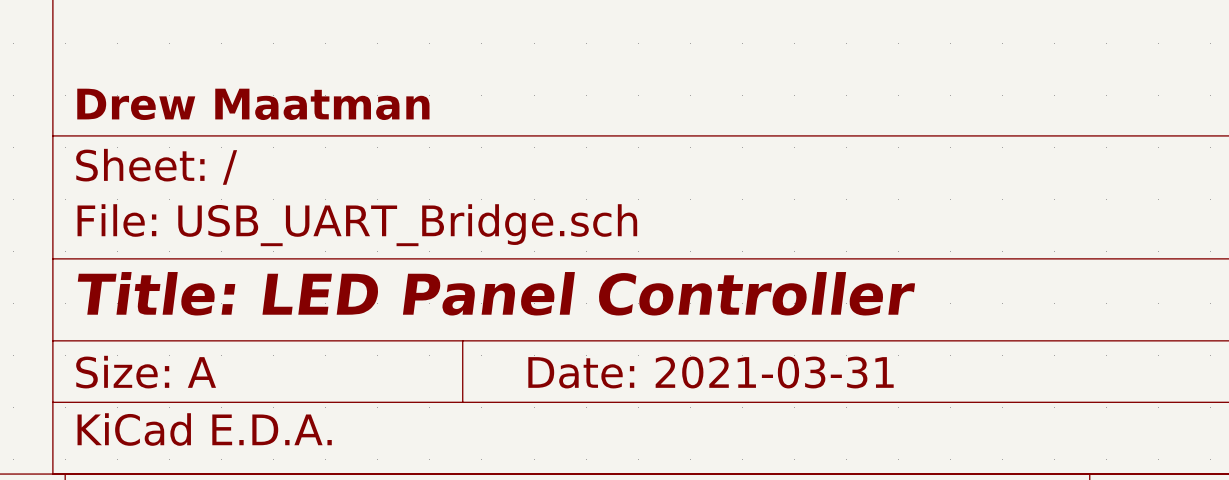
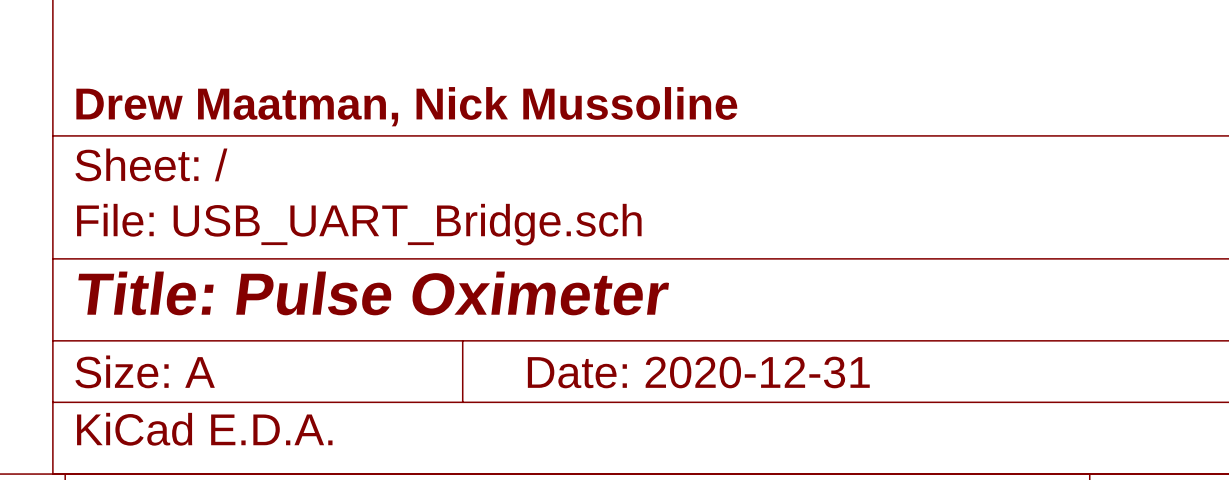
title block: Drew Maatman (253, 104) -> Drew Maatman, Nick Mussoline (406, 106)
title block: Title: LED Panel Controller (496, 293) -> Title: Pulse Oximeter (373, 293)
title block: Date: 2021-03-31 (711, 372) -> Date: 2020-12-31 (698, 372)

